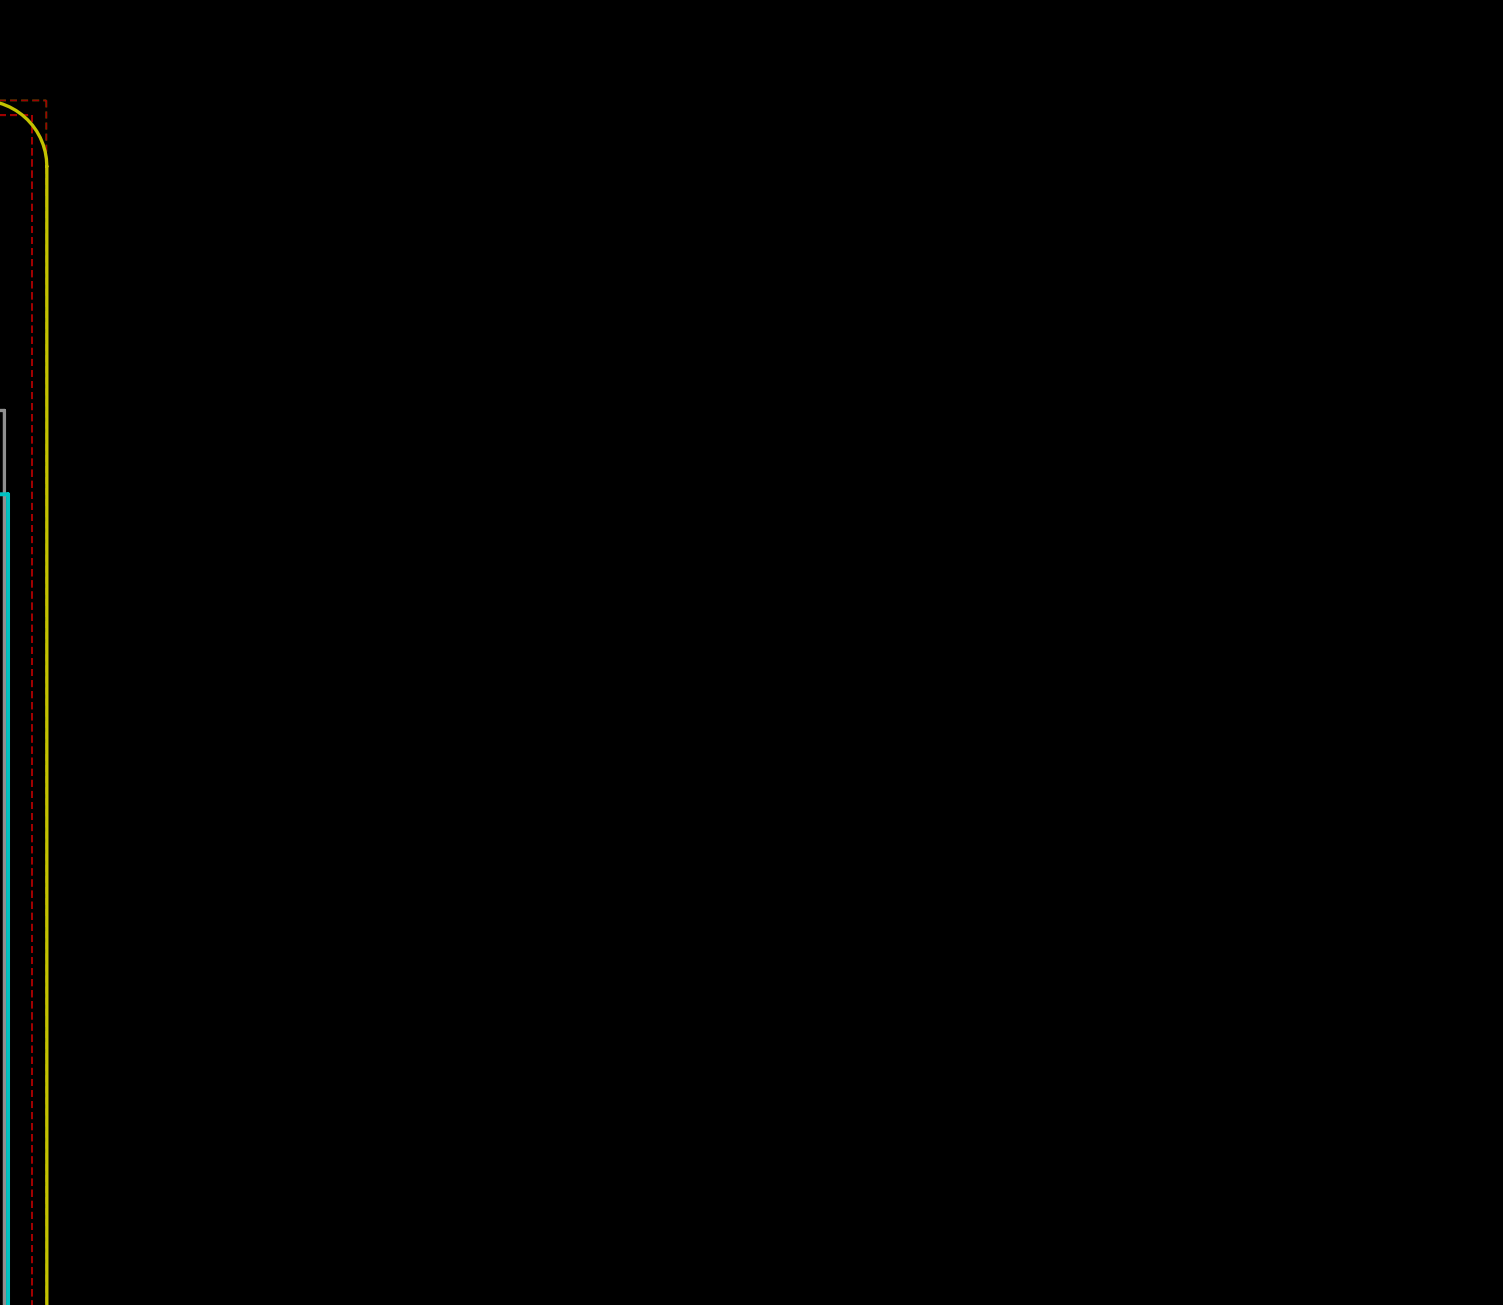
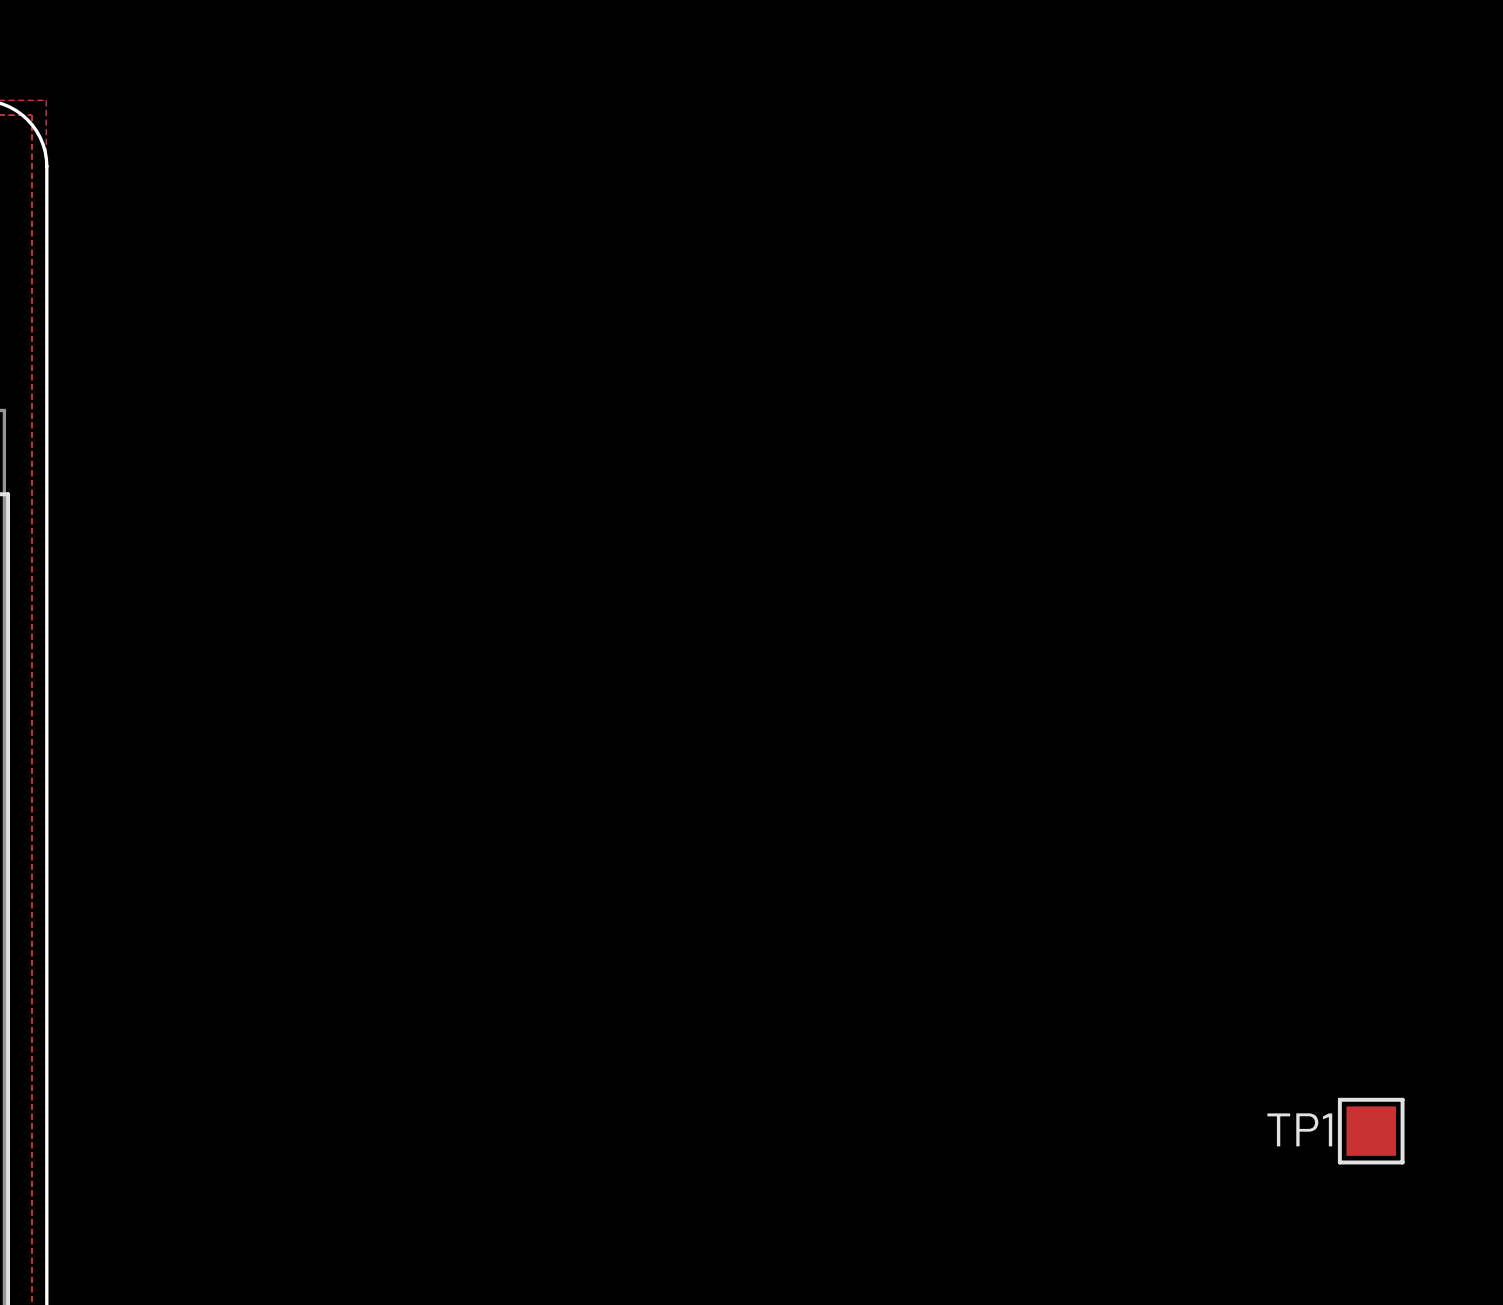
TP1: none -> (1371, 1131)

